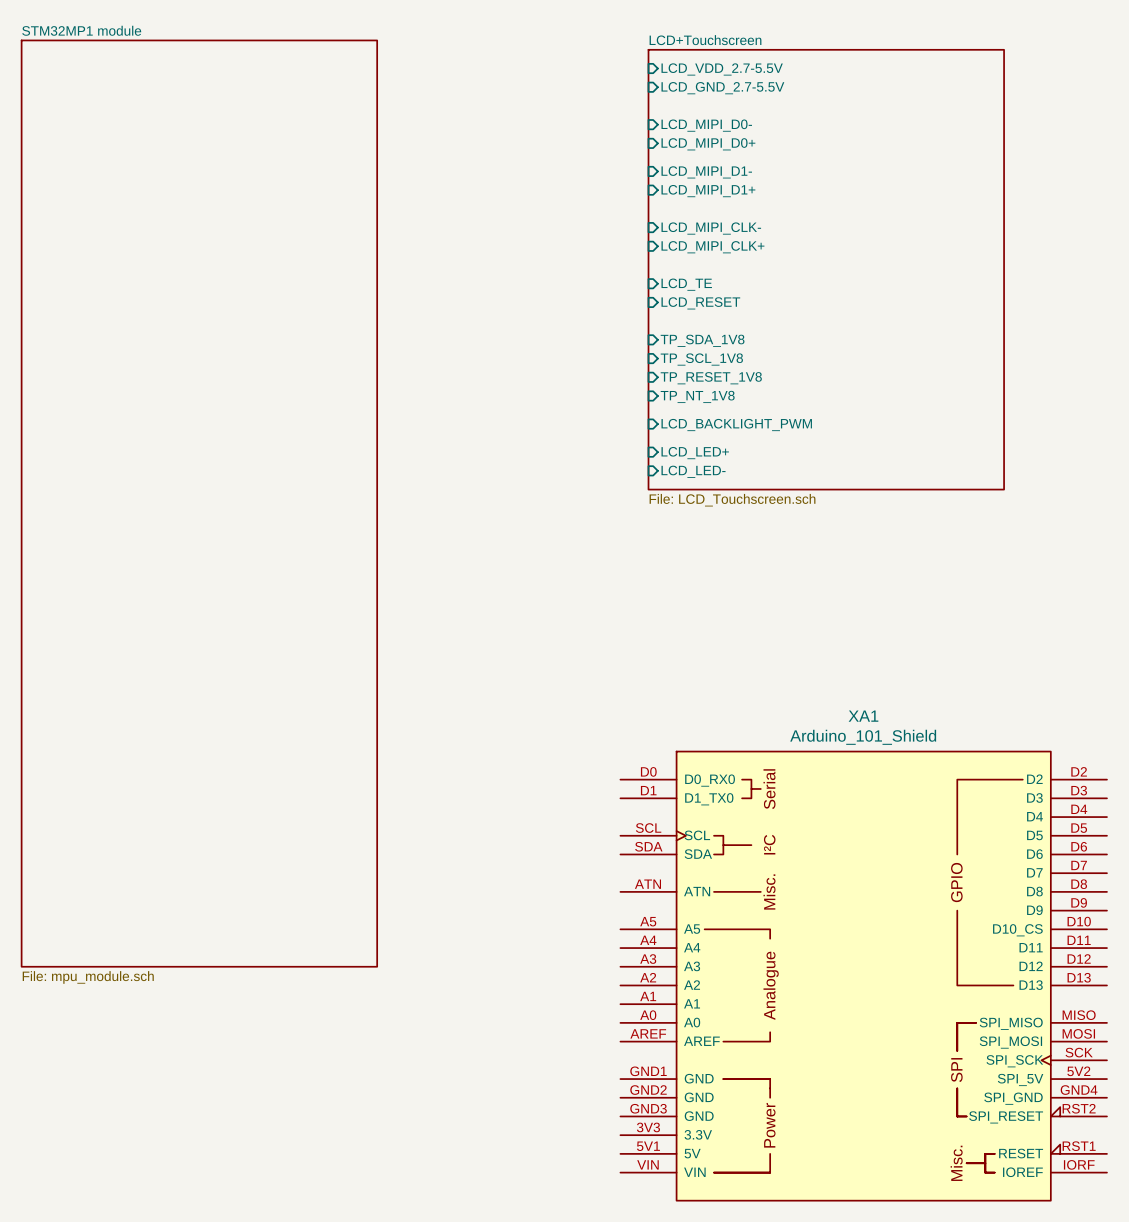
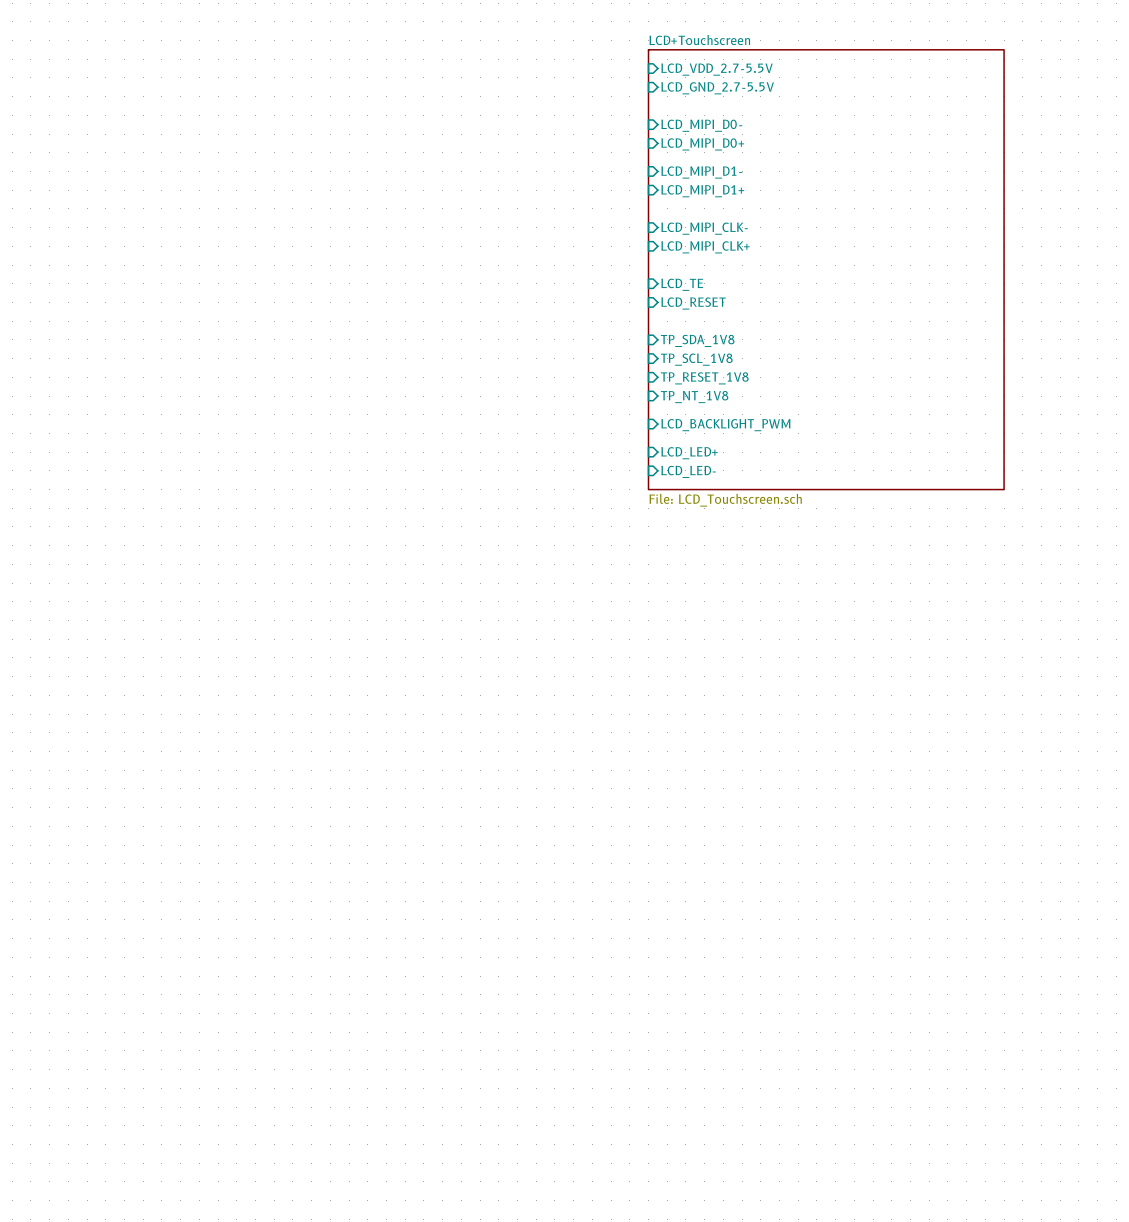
sheet STM32MP1 module: File: mpu_module.sch (199, 503) -> none
XA1: Arduino_101_Shield (863, 976) -> none

